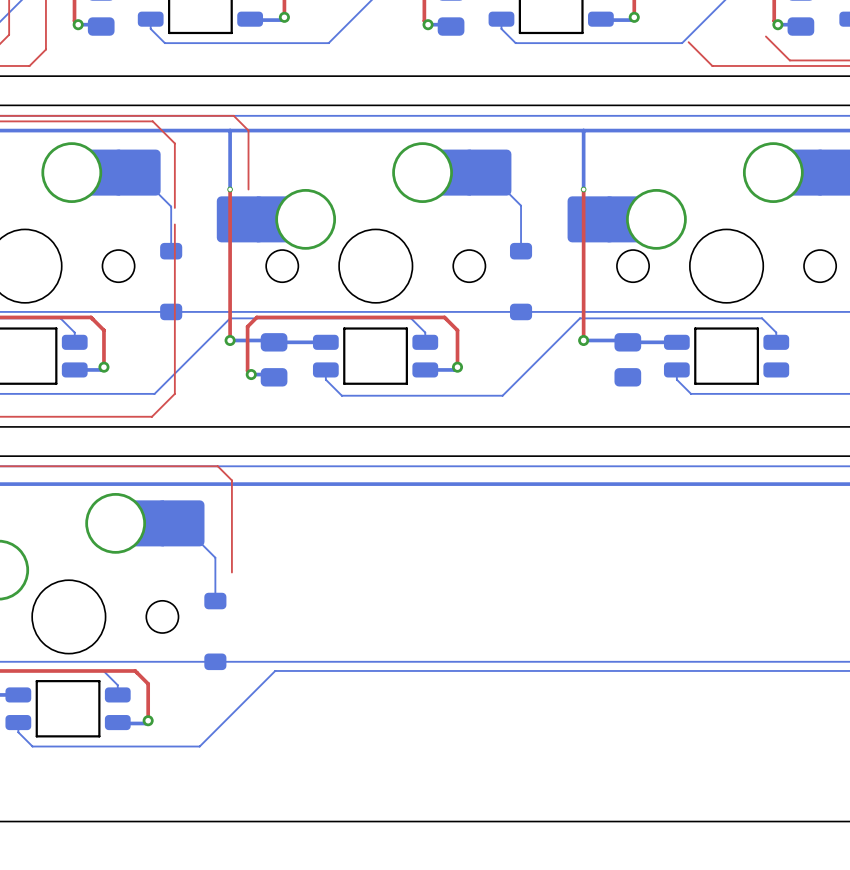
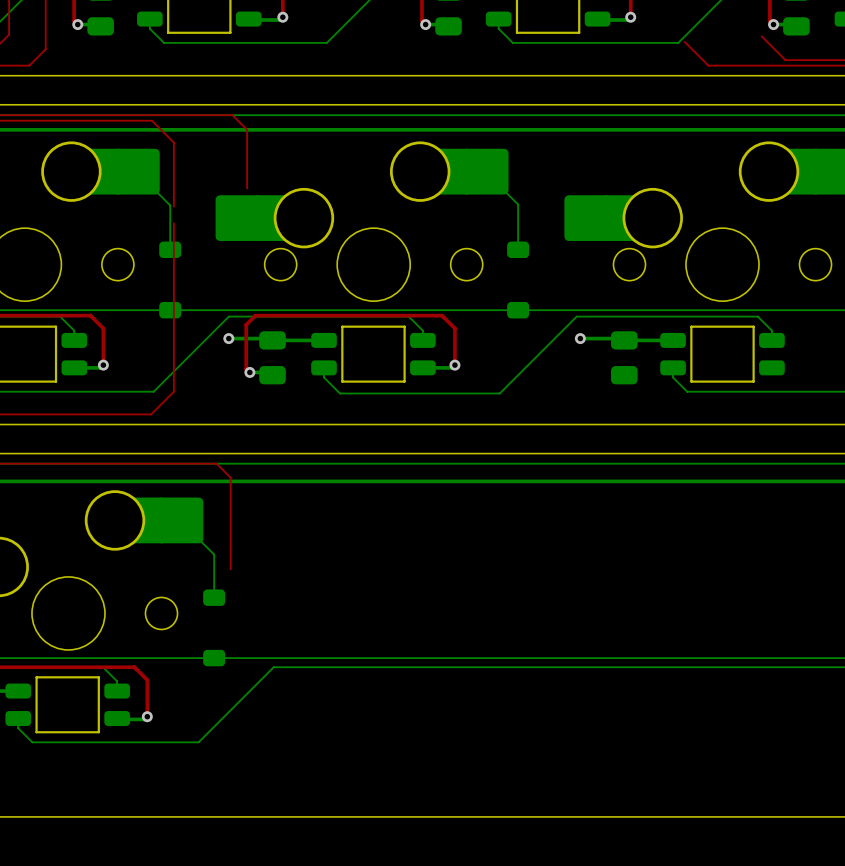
bottom track: (230, 130) (230, 189) -> none
bottom track: (583, 130) (583, 189) -> none
top track: (230, 189) (230, 340) -> none
via: (230, 189) -> none
top track: (583, 189) (583, 340) -> none
via: (583, 189) -> none

